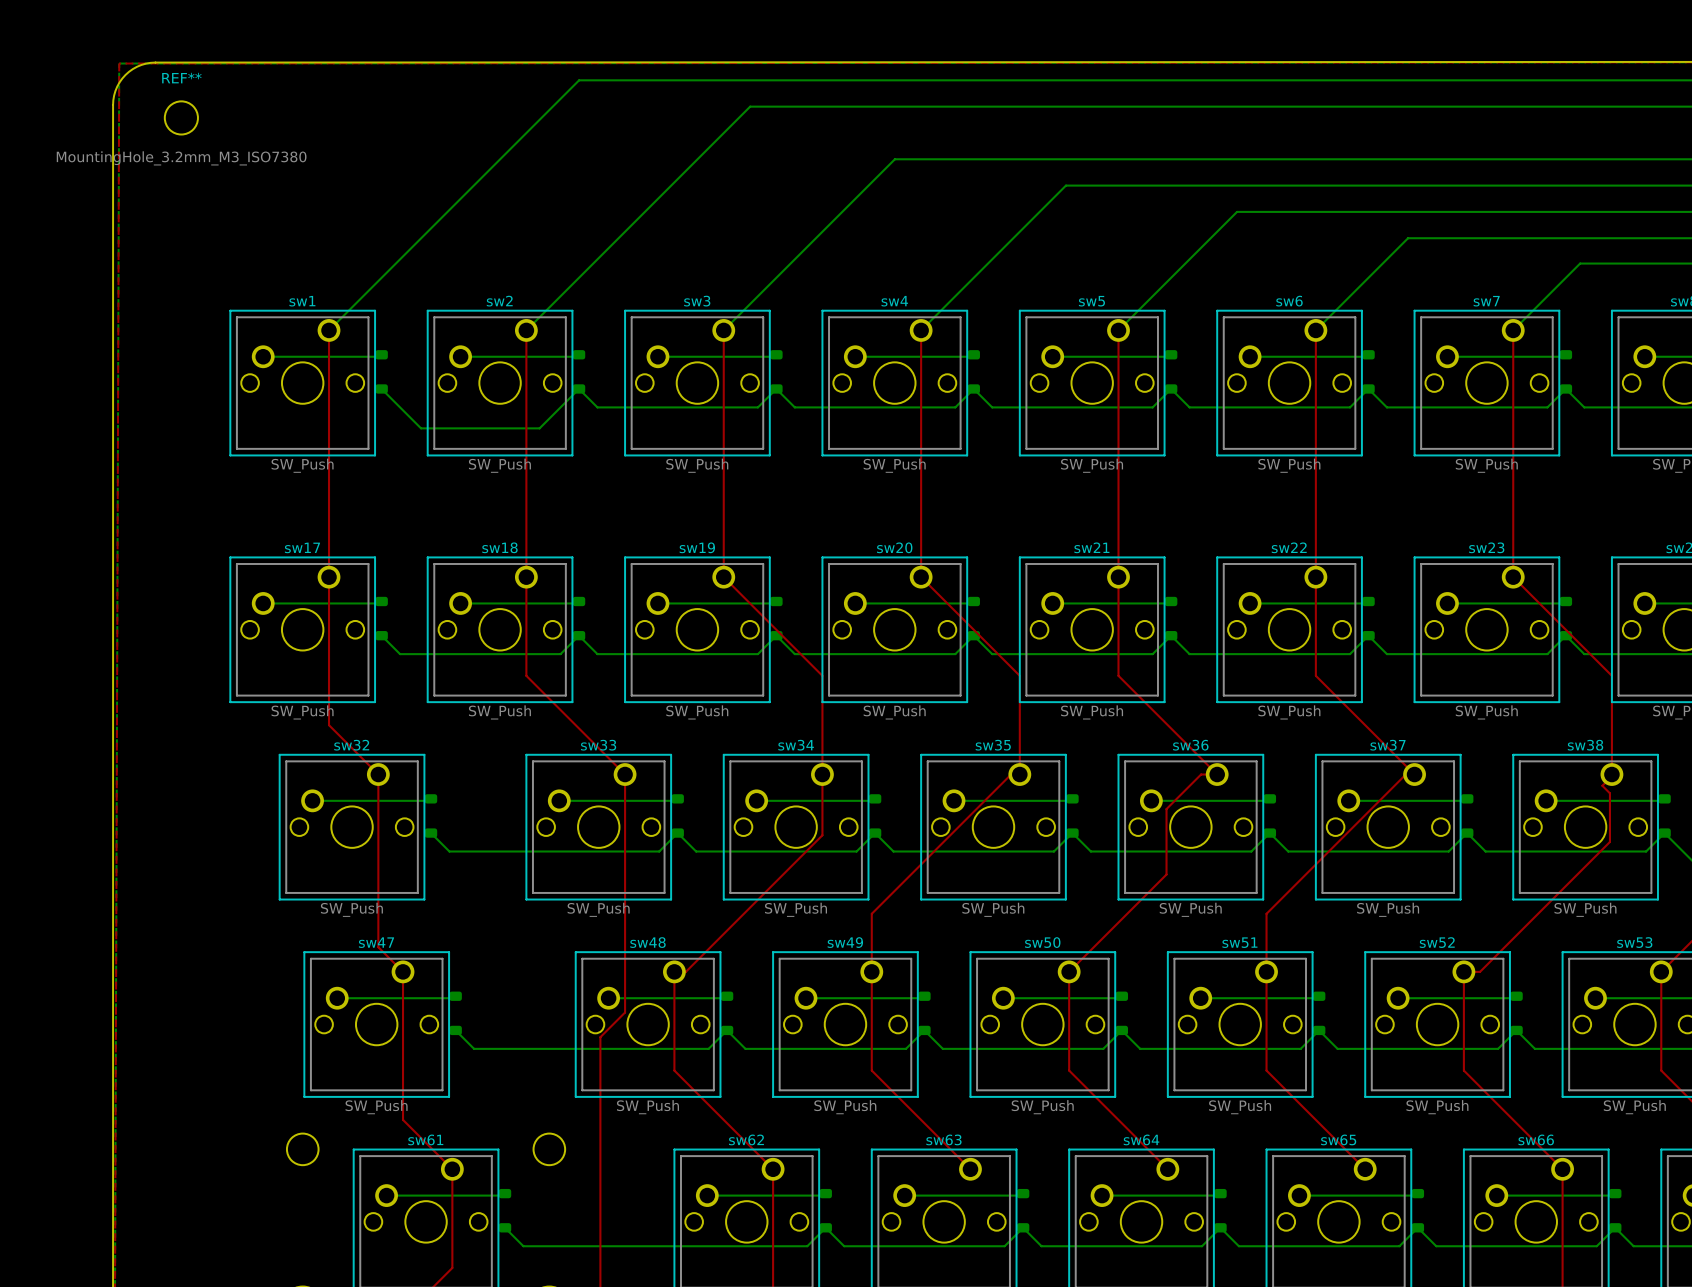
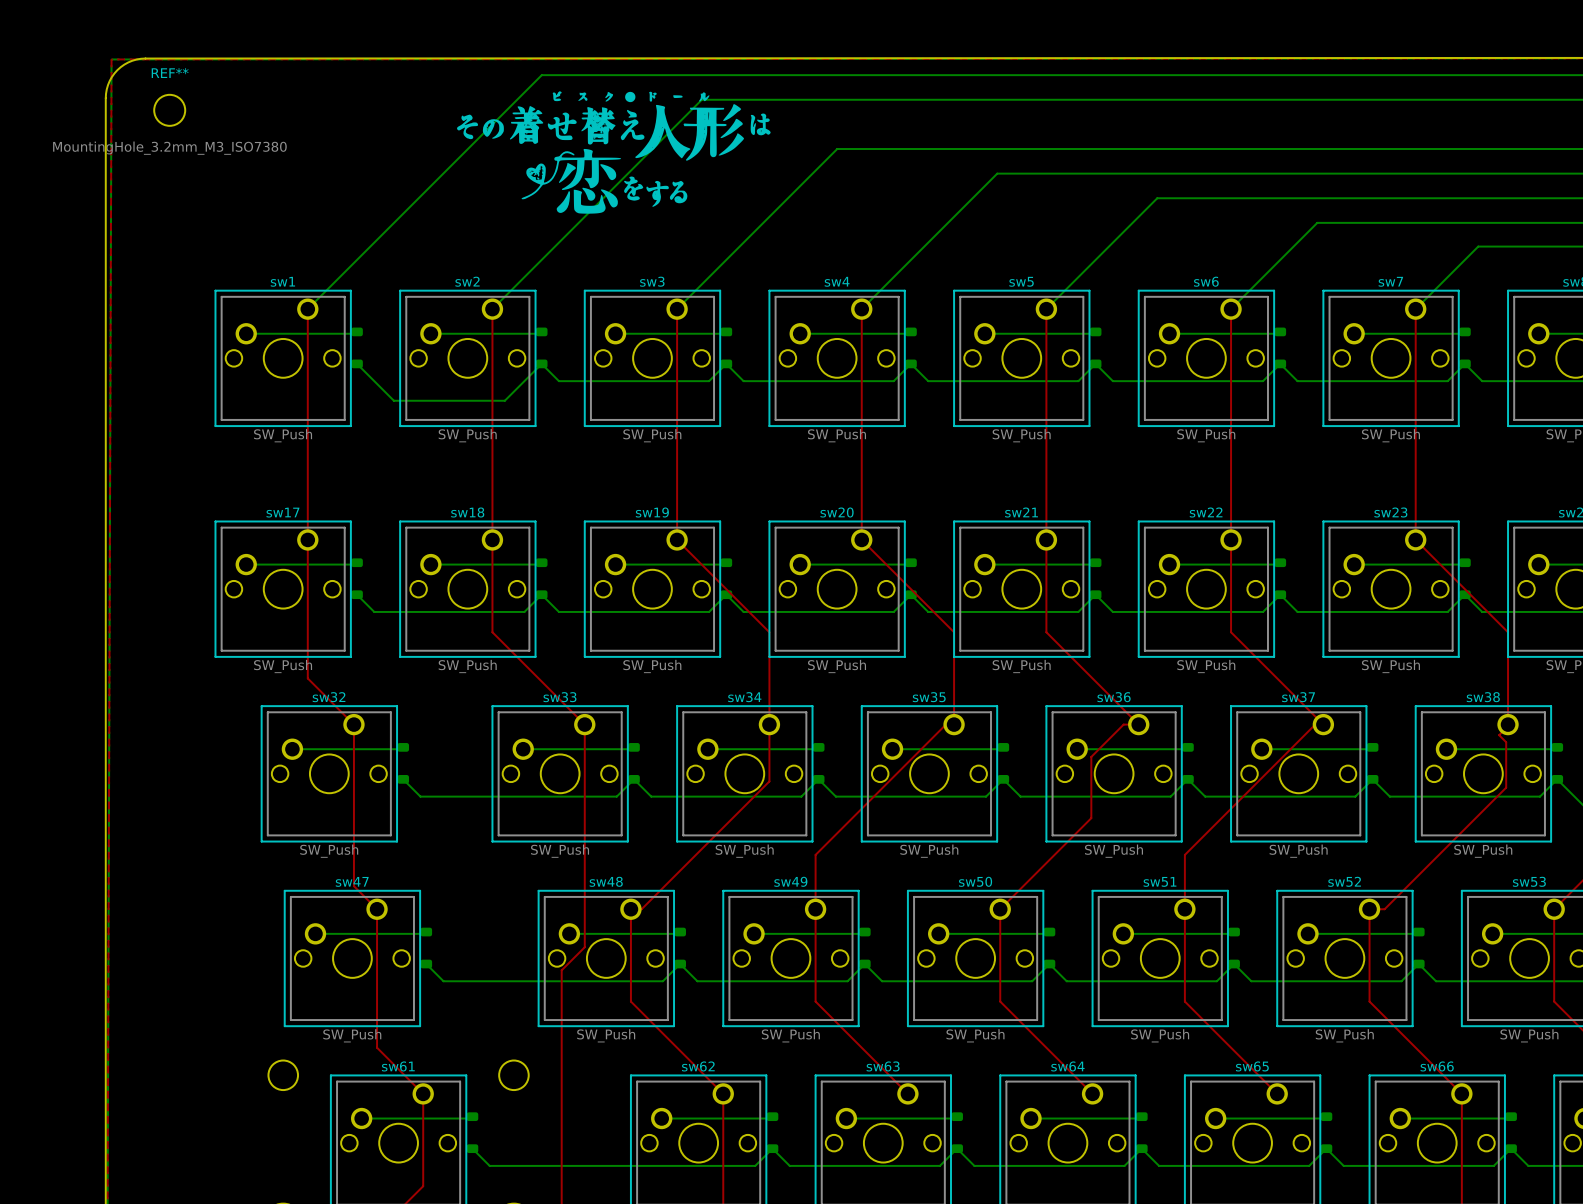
drawing: none -> [456, 91, 771, 214]

